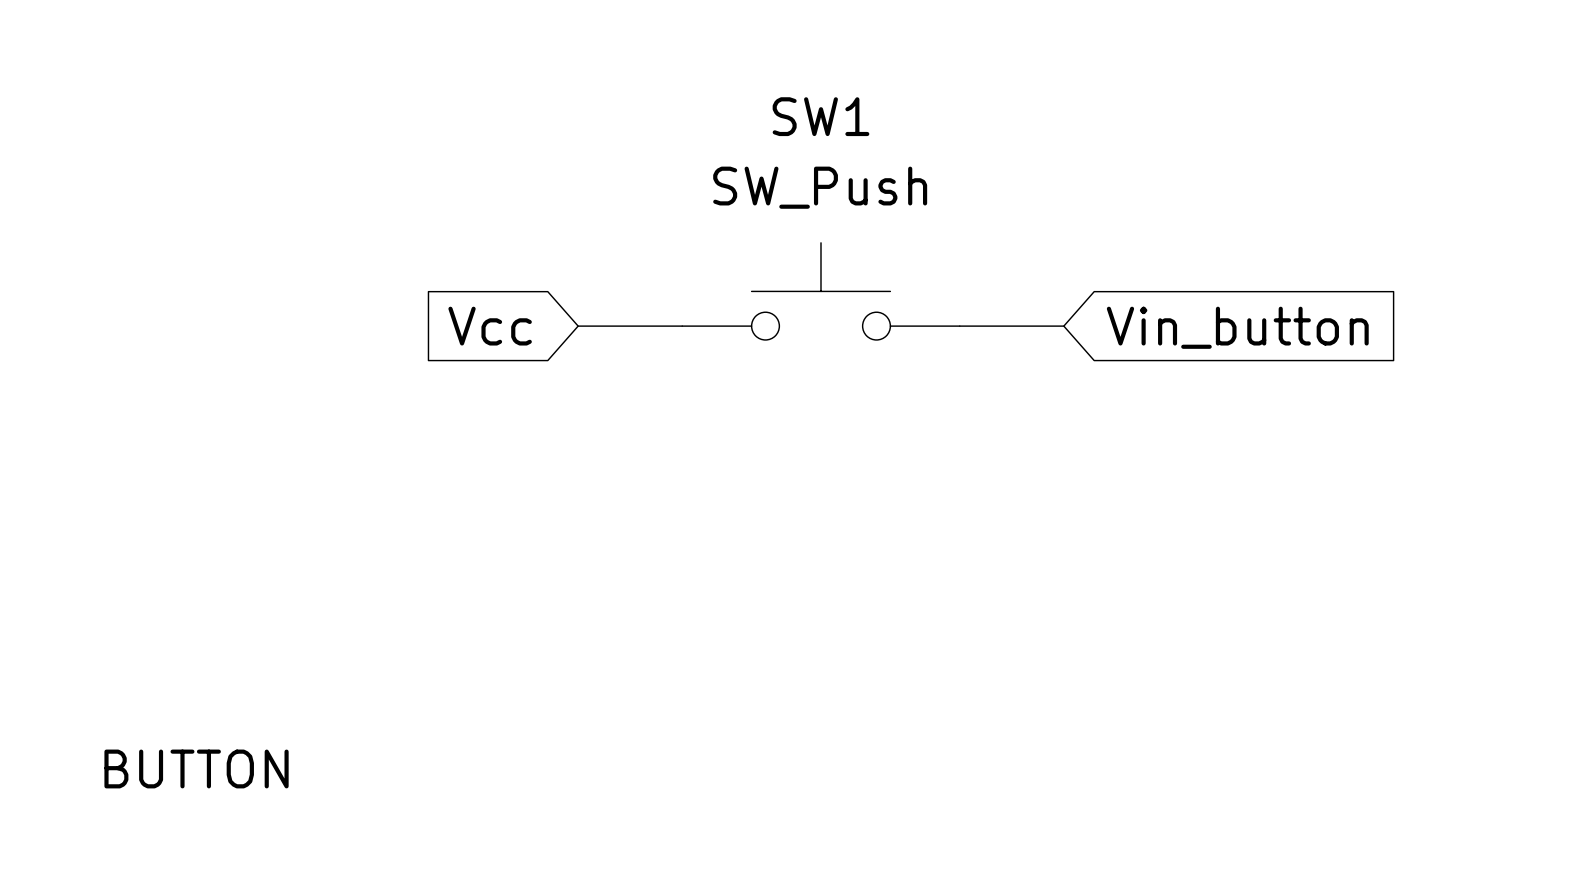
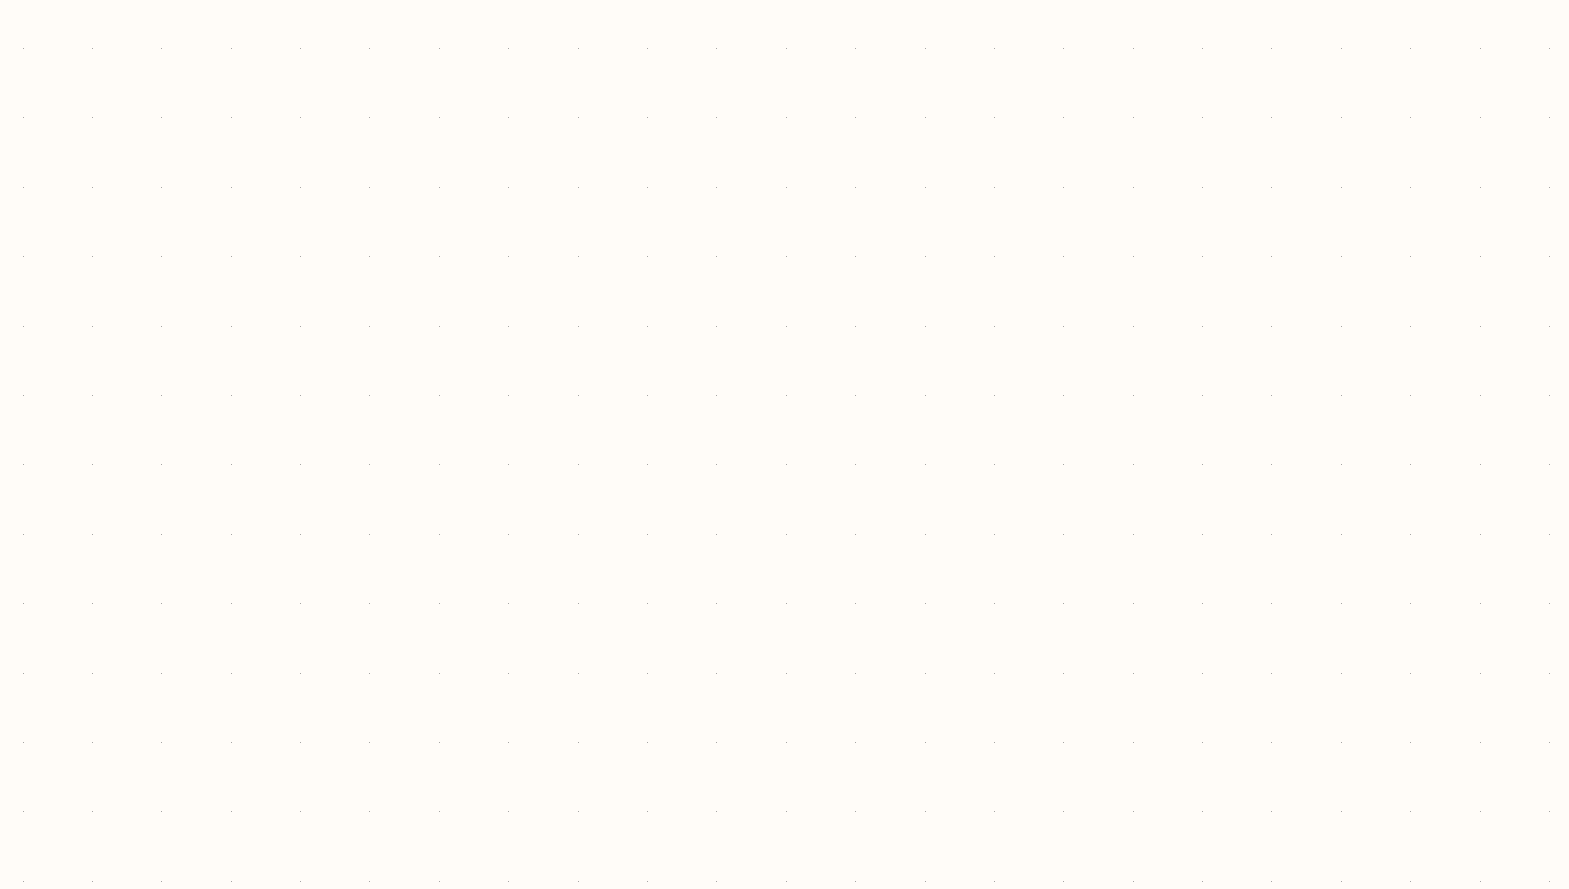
SW1: SW_Push (820, 291) -> none
global label: Vcc (490, 326) -> none
wire: (578, 326) (682, 326) -> none
wire: (959, 326) (1063, 326) -> none
global label: Vin_button (1237, 327) -> none
text: BUTTON (196, 768) -> none

